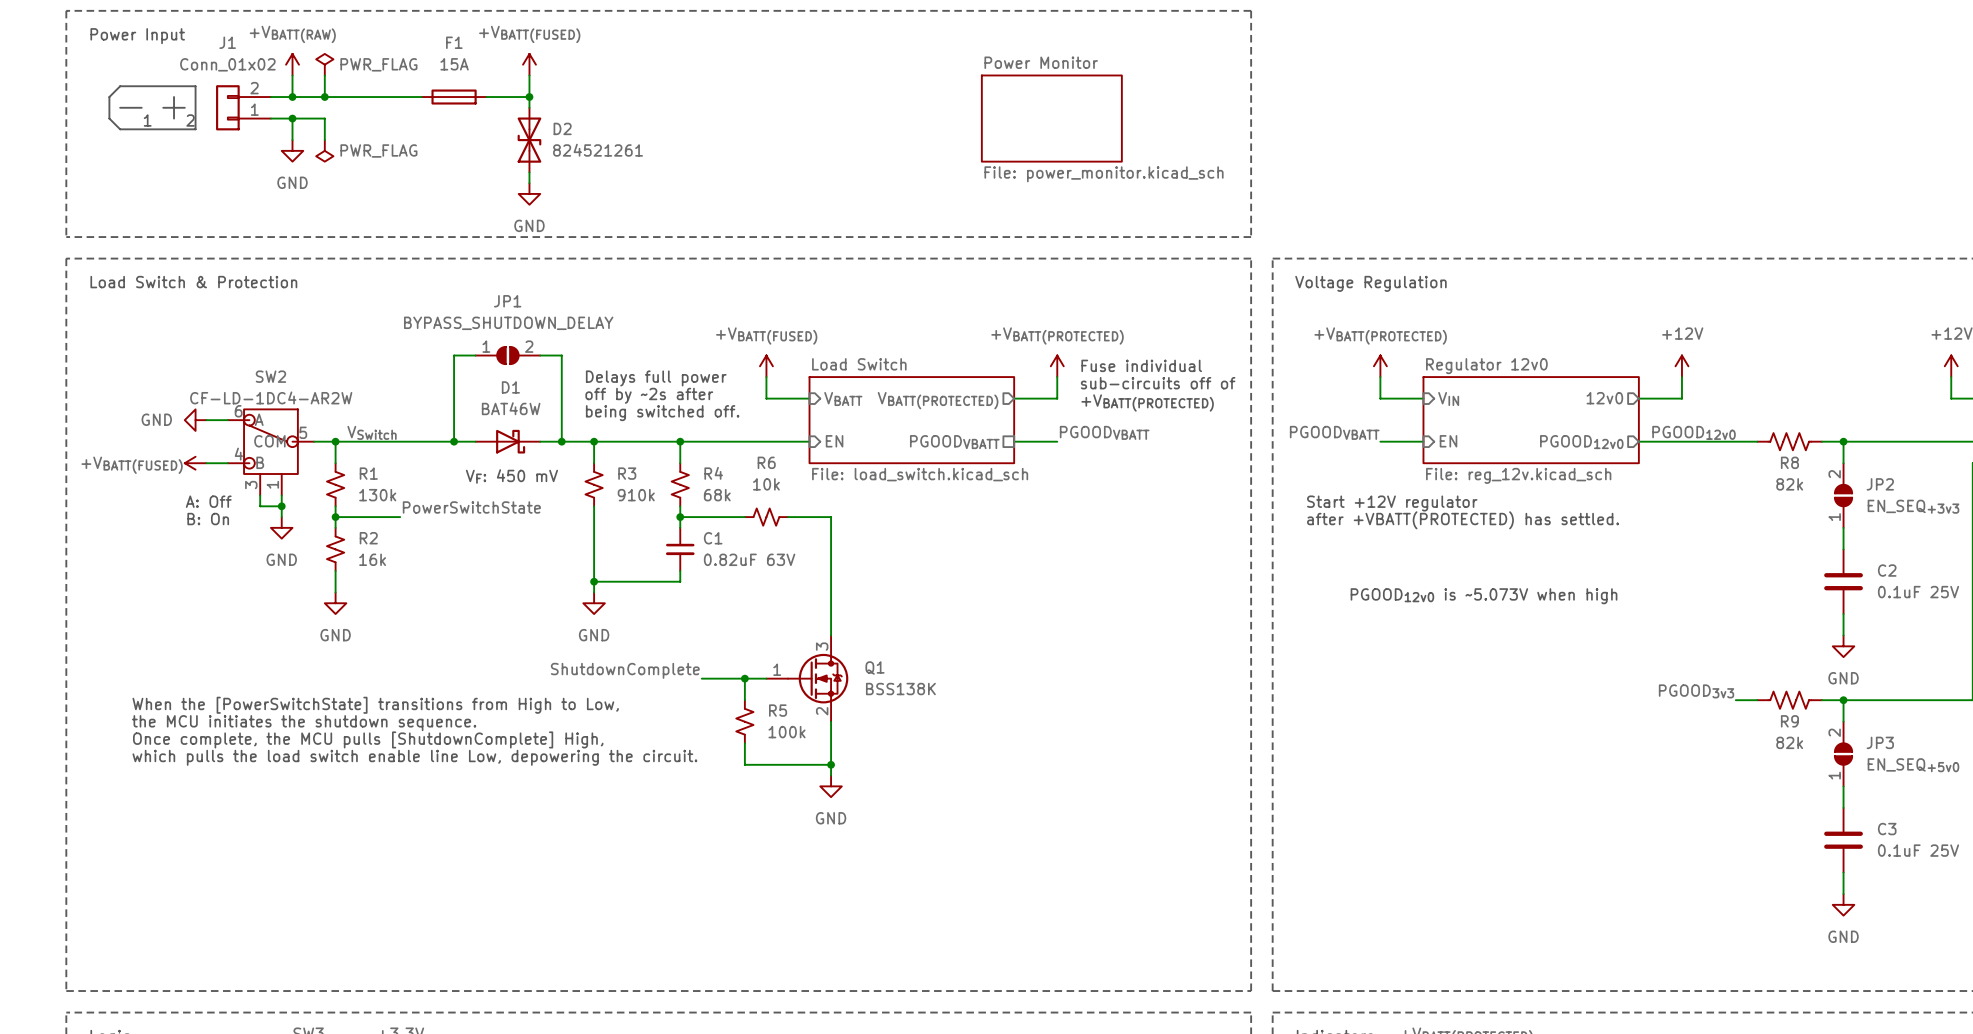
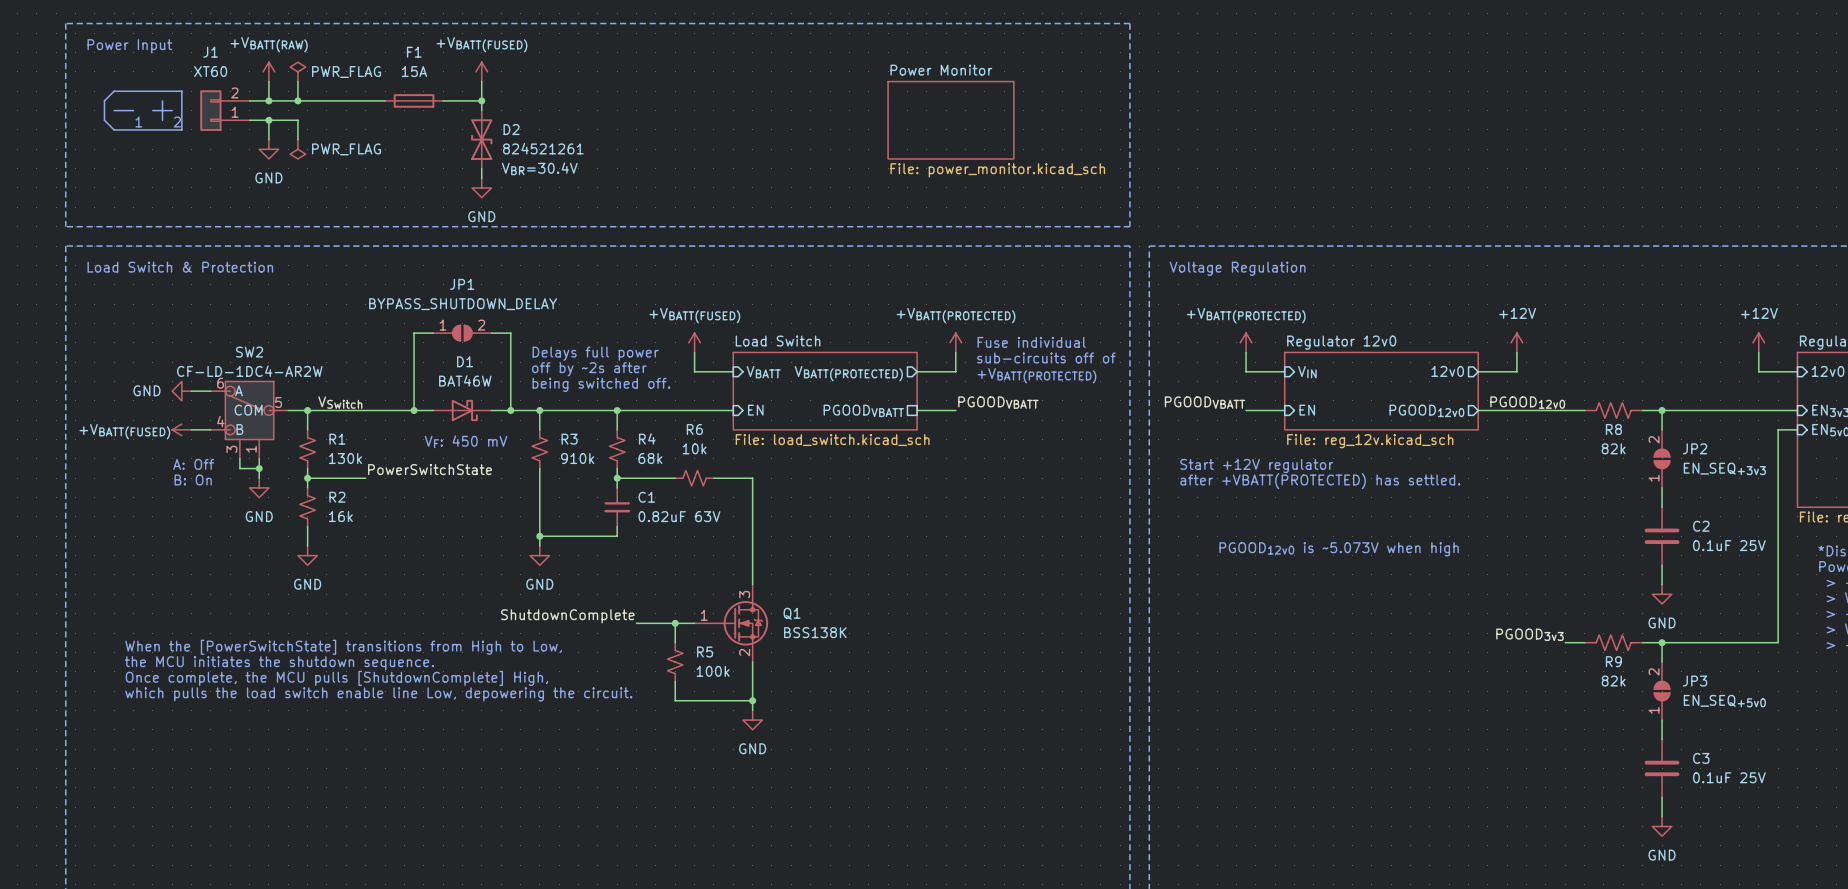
J1 value: Conn_01x02 (227, 64) -> XT60 (210, 71)
D2 text: none -> VBR=30.4V (539, 168)

